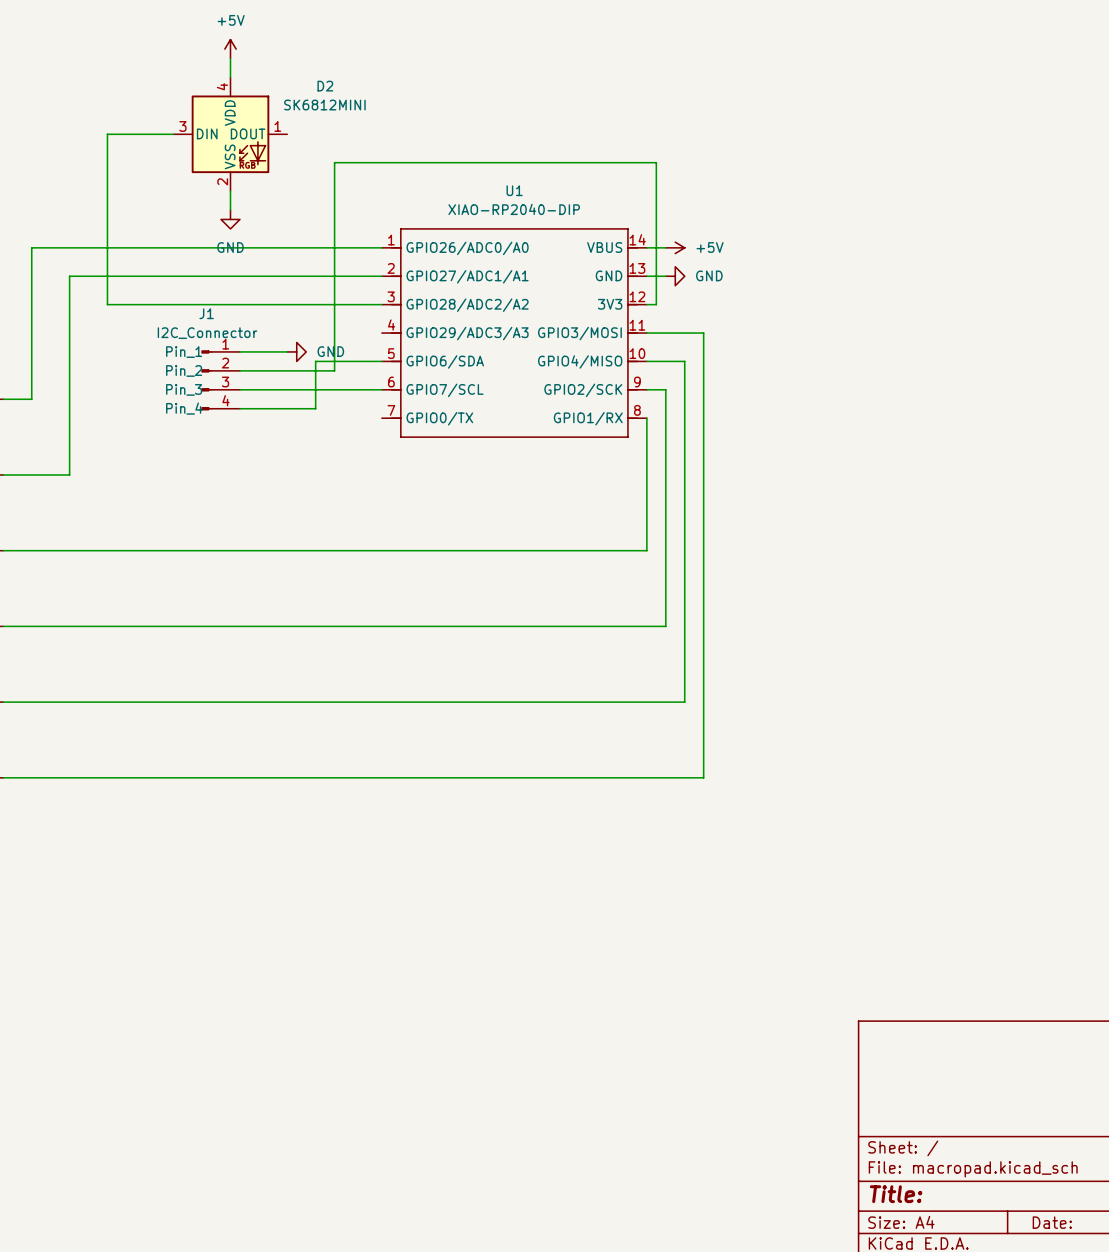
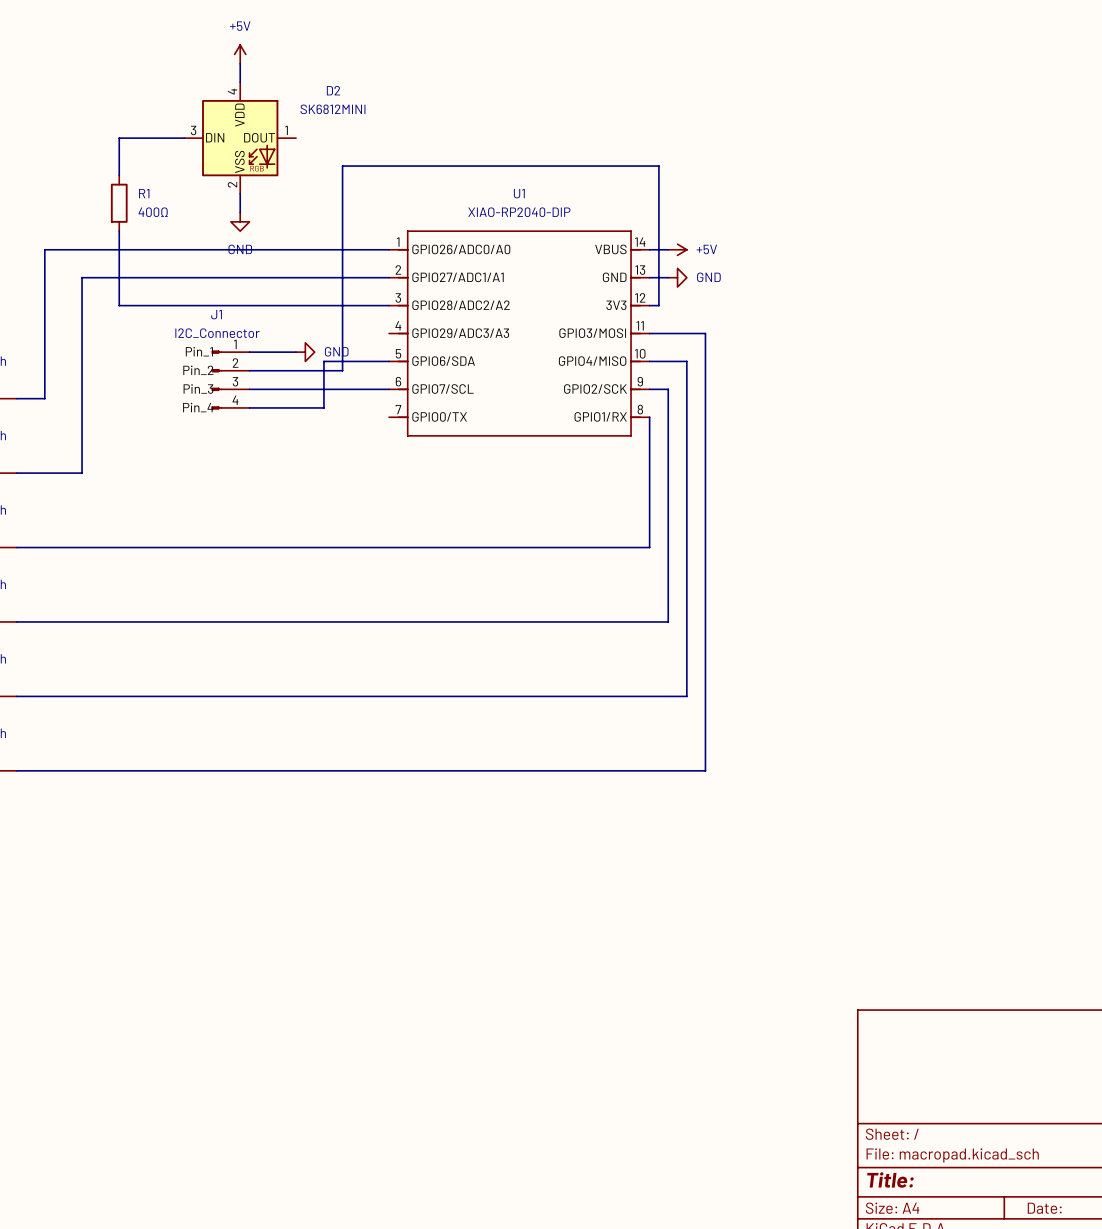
wire: (107, 172) (107, 228) -> none
R1: none -> 400Ω (119, 203)

